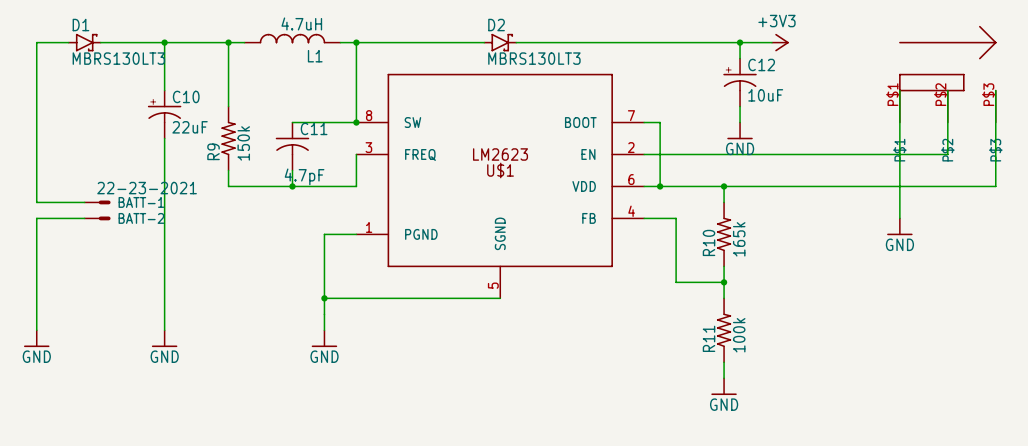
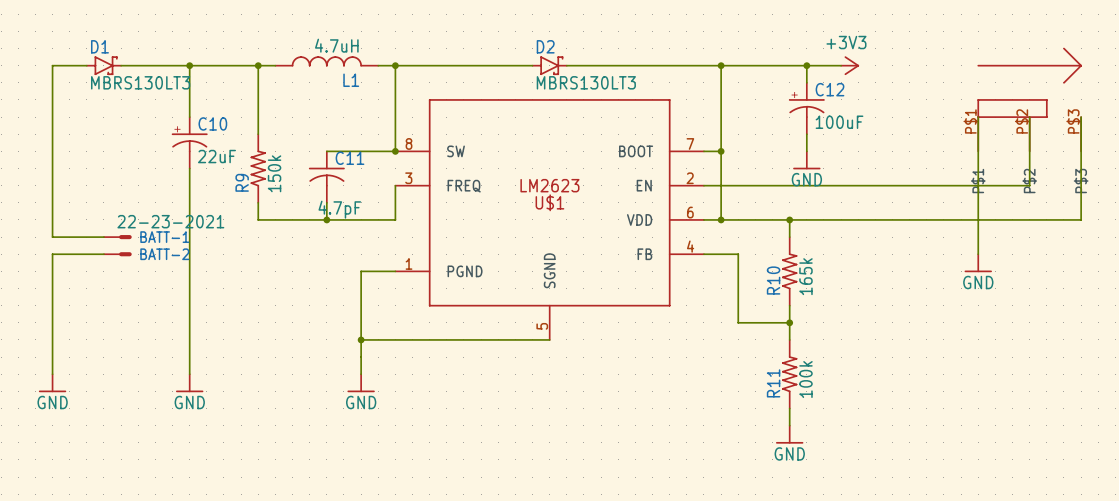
wire: none -> (721, 65) (721, 151)
junction: none -> (721, 65)
C12 value: 10uF (765, 95) -> 100uF (839, 122)
junction: none -> (721, 151)

